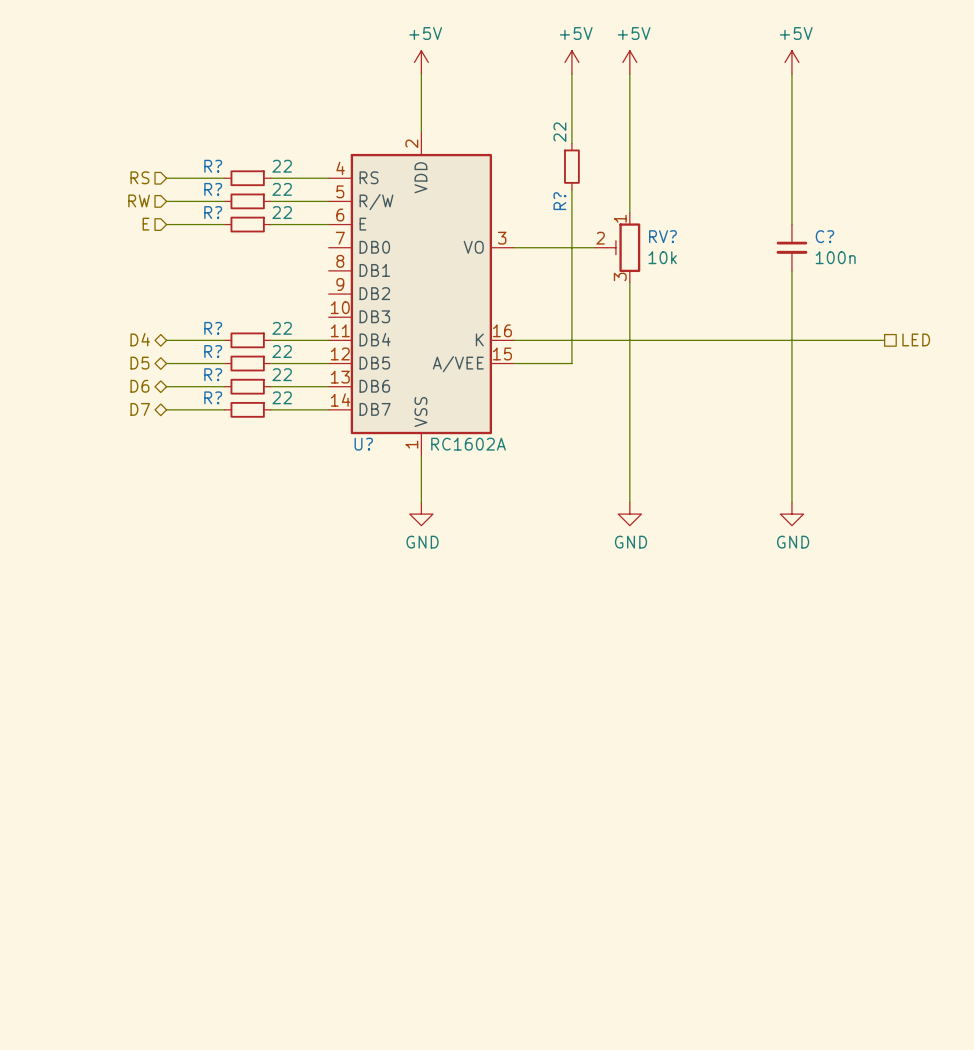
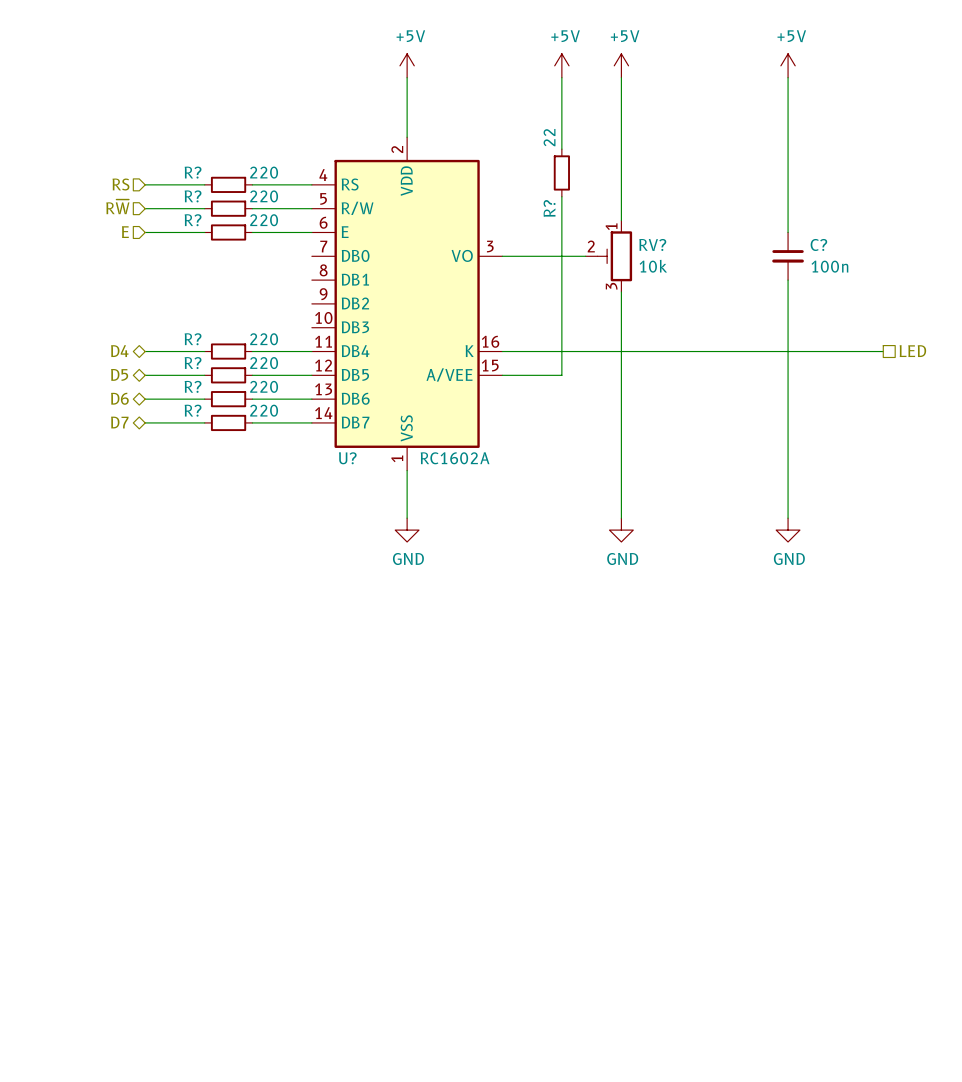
R? value: 22 (282, 166) -> 220 (264, 172)
R? value: 22 (282, 189) -> 220 (264, 196)
hierarchical label: RW (139, 200) -> R~{W} (117, 206)
R? value: 22 (282, 212) -> 220 (264, 220)
R? value: 22 (282, 328) -> 220 (264, 339)
R? value: 22 (282, 351) -> 220 (264, 363)
R? value: 22 (282, 374) -> 220 (264, 386)
R? value: 22 (282, 397) -> 220 (264, 410)

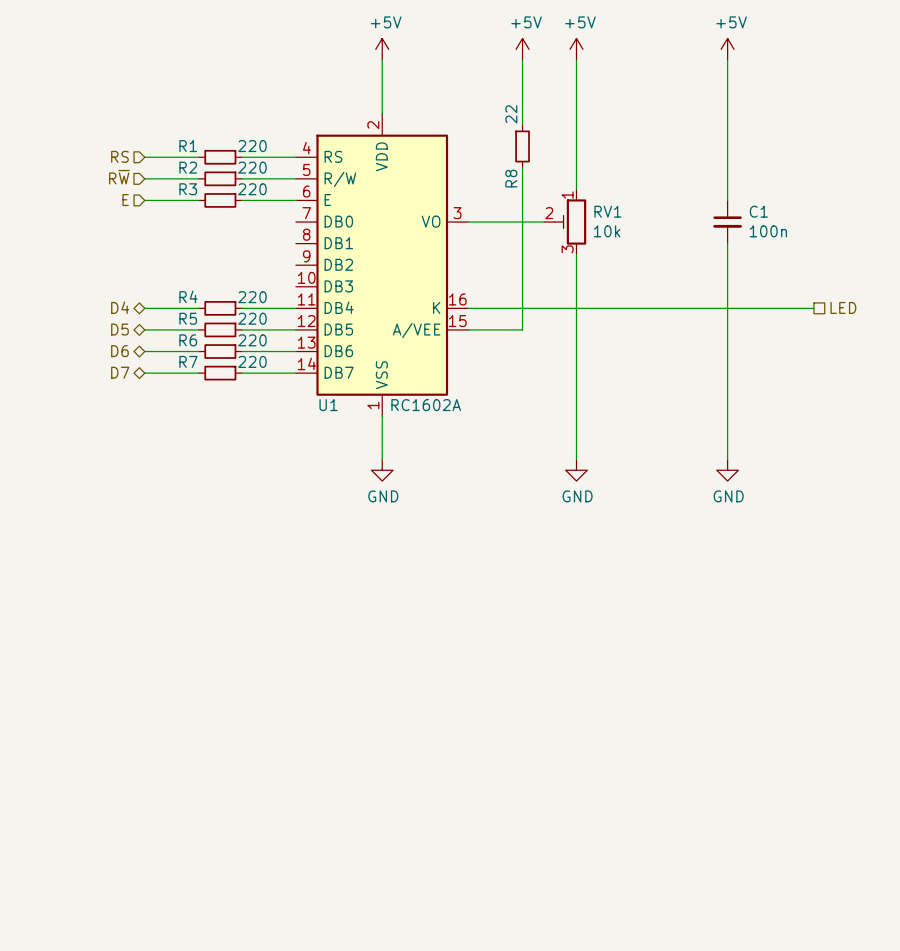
R? name: R? (193, 172) -> R1 (188, 146)
R? name: R? (193, 196) -> R2 (188, 167)
R? name: R? (549, 208) -> R8 (511, 178)
R? name: R? (193, 220) -> R3 (188, 189)
RV? name: RV? (652, 244) -> RV1 (607, 211)
C? name: C? (818, 244) -> C1 (758, 211)
R? name: R? (193, 339) -> R4 (188, 296)
R? name: R? (193, 363) -> R5 (188, 318)
R? name: R? (193, 386) -> R6 (188, 340)
R? name: R? (193, 410) -> R7 (188, 361)
U? name: U? (347, 458) -> U1 (328, 405)

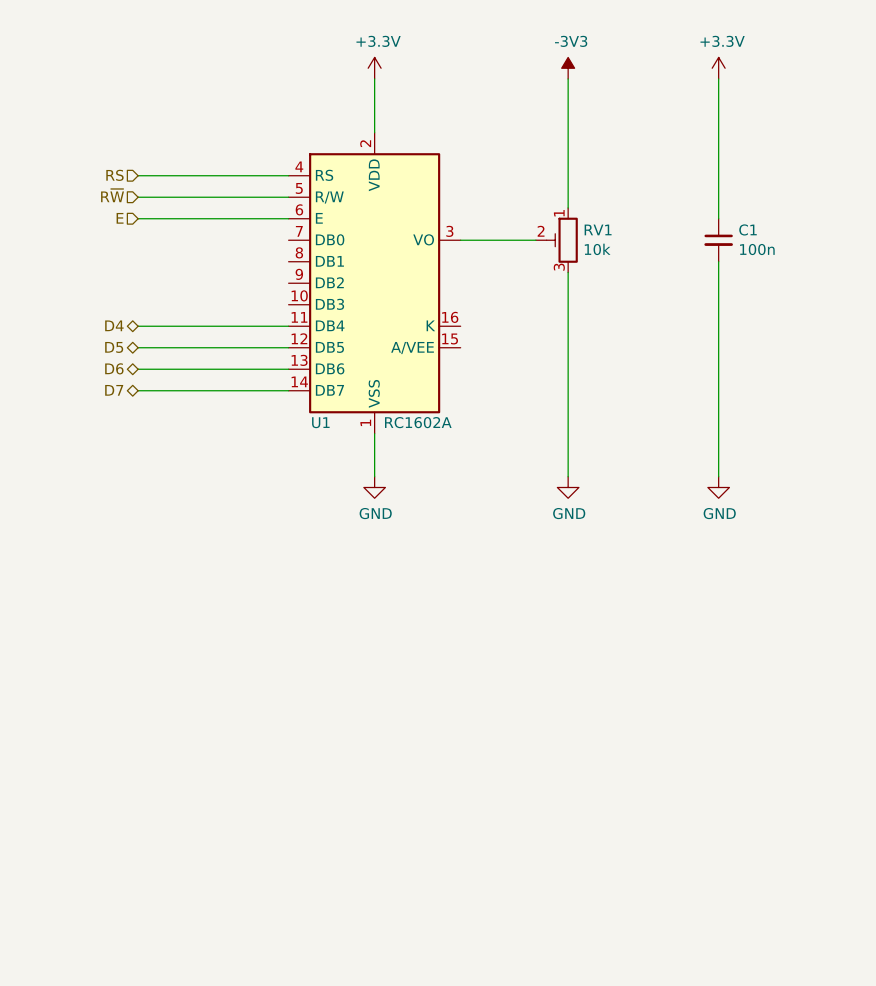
power symbol: +5V (382, 49) -> +3.3V (374, 68)
power symbol: +5V (522, 49) -> none
power symbol: +5V (576, 49) -> -3V3 (568, 68)
power symbol: +5V (727, 49) -> +3.3V (718, 68)
wire: (522, 60) (522, 124) -> none
R8: 22 (522, 146) -> none
wire: none -> (191, 175) (234, 175)
R1: 220 (220, 157) -> none
wire: (522, 168) (522, 329) (468, 329) -> none
wire: none -> (191, 197) (234, 197)
R2: 220 (220, 178) -> none
wire: none -> (191, 218) (234, 218)
R3: 220 (220, 200) -> none
hierarchical label: LED (843, 307) -> none
wire: none -> (191, 326) (234, 326)
R4: 220 (220, 308) -> none
wire: (468, 308) (813, 308) -> none
wire: none -> (191, 347) (234, 347)
R5: 220 (220, 329) -> none
wire: none -> (191, 369) (234, 369)
R6: 220 (220, 351) -> none
wire: none -> (191, 390) (234, 390)
R7: 220 (220, 373) -> none

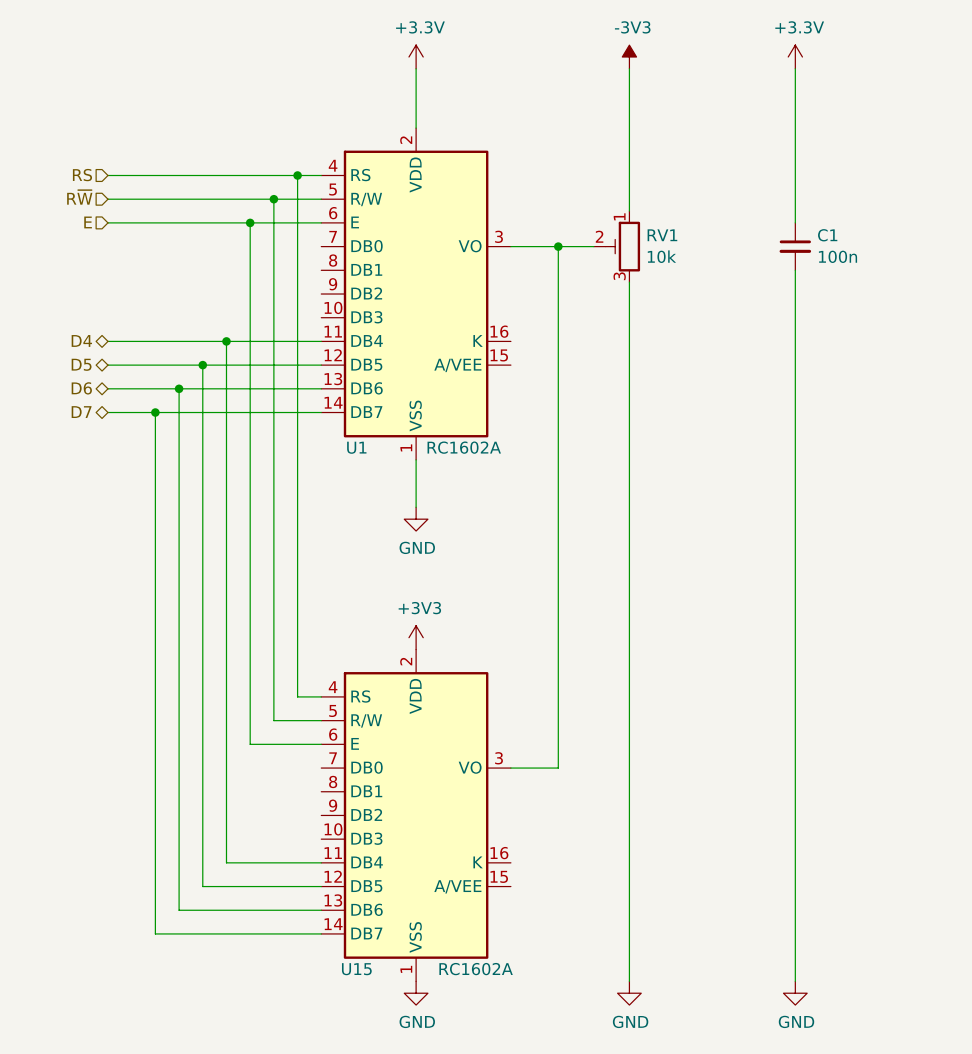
wire: none -> (107, 175) (155, 175)
hierarchical label position: RS (114, 175) -> RS (82, 175)
wire: none -> (297, 175) (297, 696) (321, 696)
junction: none -> (297, 175)
hierarchical label position: R~{W} (112, 195) -> R~{W} (79, 197)
wire: none -> (107, 199) (155, 199)
wire: none -> (273, 199) (273, 720) (321, 720)
junction: none -> (273, 199)
wire: none -> (107, 222) (155, 222)
hierarchical label position: E (120, 218) -> E (88, 222)
wire: none -> (250, 222) (250, 744) (321, 744)
junction: none -> (250, 222)
wire: none -> (558, 246) (558, 768) (510, 768)
junction: none -> (558, 246)
hierarchical label position: D4 (114, 325) -> D4 (81, 340)
wire: none -> (107, 341) (155, 341)
wire: none -> (226, 341) (226, 862) (321, 862)
junction: none -> (226, 341)
wire: none -> (107, 365) (155, 365)
hierarchical label position: D5 (114, 347) -> D5 (81, 364)
wire: none -> (202, 365) (202, 886) (321, 886)
junction: none -> (202, 365)
hierarchical label position: D6 (114, 368) -> D6 (81, 388)
wire: none -> (107, 388) (155, 388)
wire: none -> (179, 388) (179, 910) (321, 910)
junction: none -> (179, 388)
wire: none -> (107, 412) (155, 412) (155, 933) (321, 933)
hierarchical label position: D7 (114, 390) -> D7 (81, 412)
junction: none -> (155, 412)
wire: none -> (629, 507) (629, 981)
wire: none -> (795, 507) (795, 981)
power symbol: GND (568, 487) -> none
power symbol: GND (718, 487) -> none
power symbol: none -> +3V3 (416, 637)
U15: none -> RC1602A (416, 815)
power symbol: none -> GND (416, 993)
power symbol: none -> GND (629, 993)
power symbol: none -> GND (795, 993)

